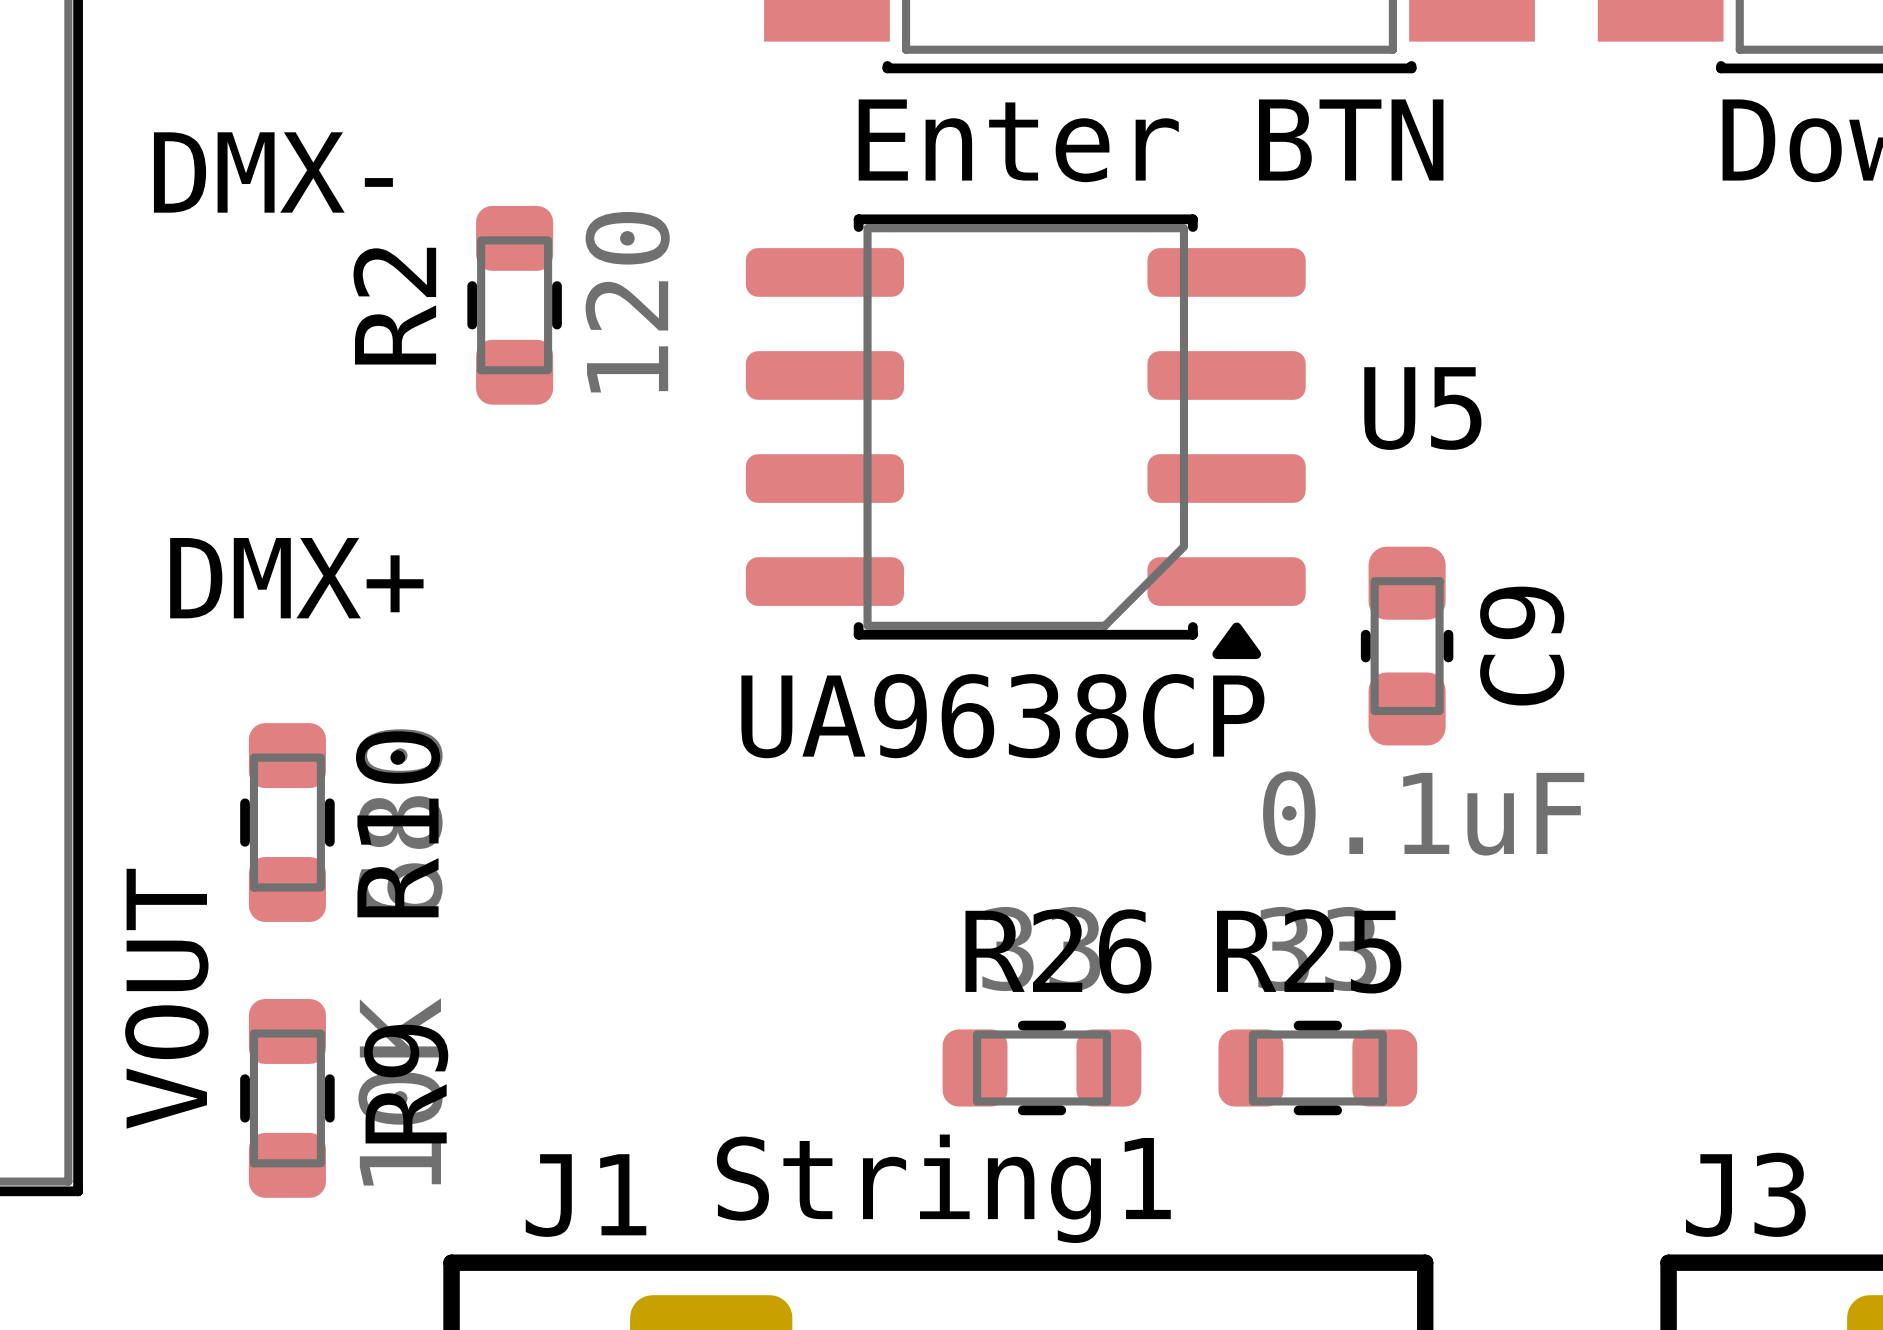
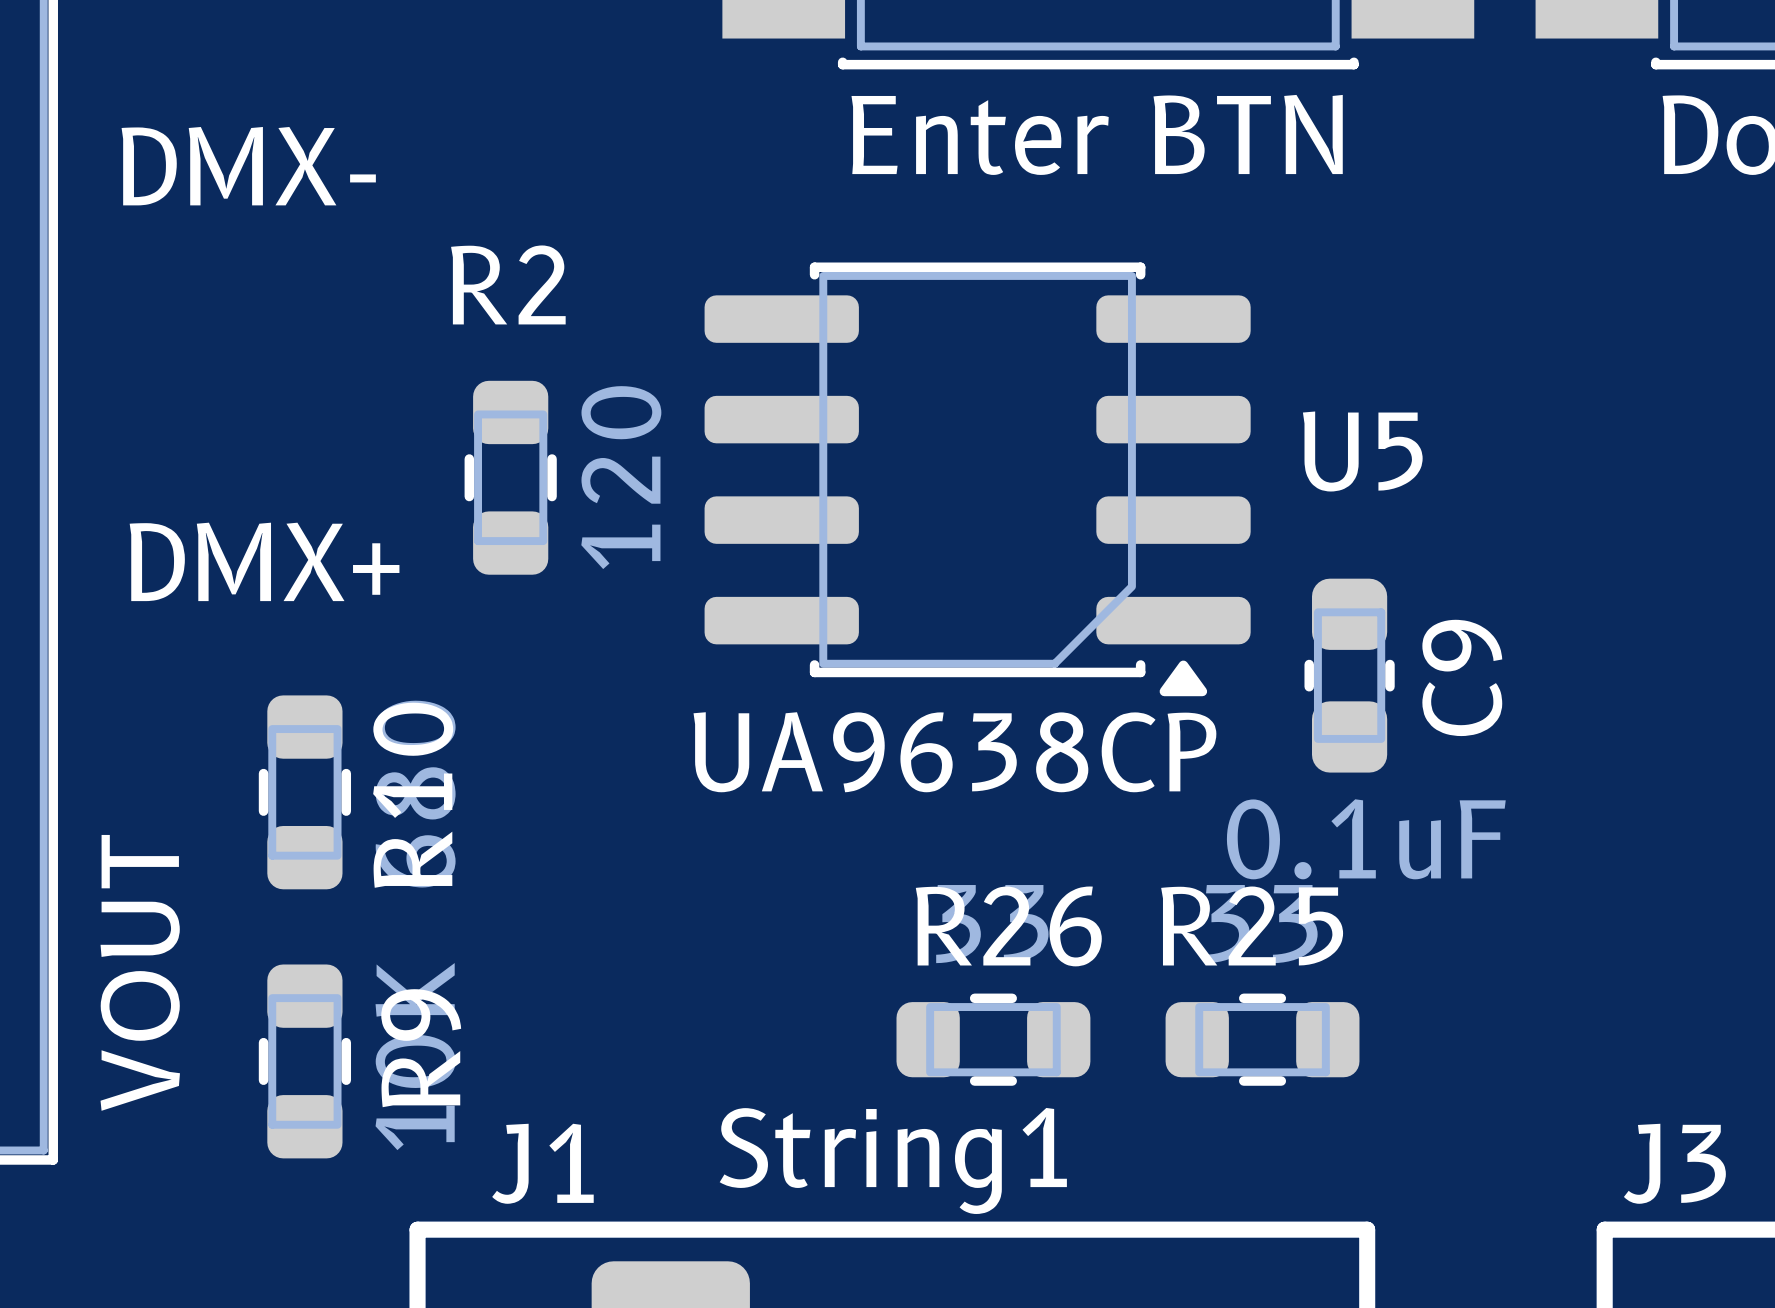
R2 position: (514, 305) -> (510, 477)
R2 name rotation: 0° (394, 306) -> 90° clockwise (508, 284)
U5 position: (1025, 436) -> (977, 479)
C9 position: (1407, 646) -> (1349, 675)
R10 position: (287, 822) -> (304, 792)
R9 position: (287, 1098) -> (304, 1061)

